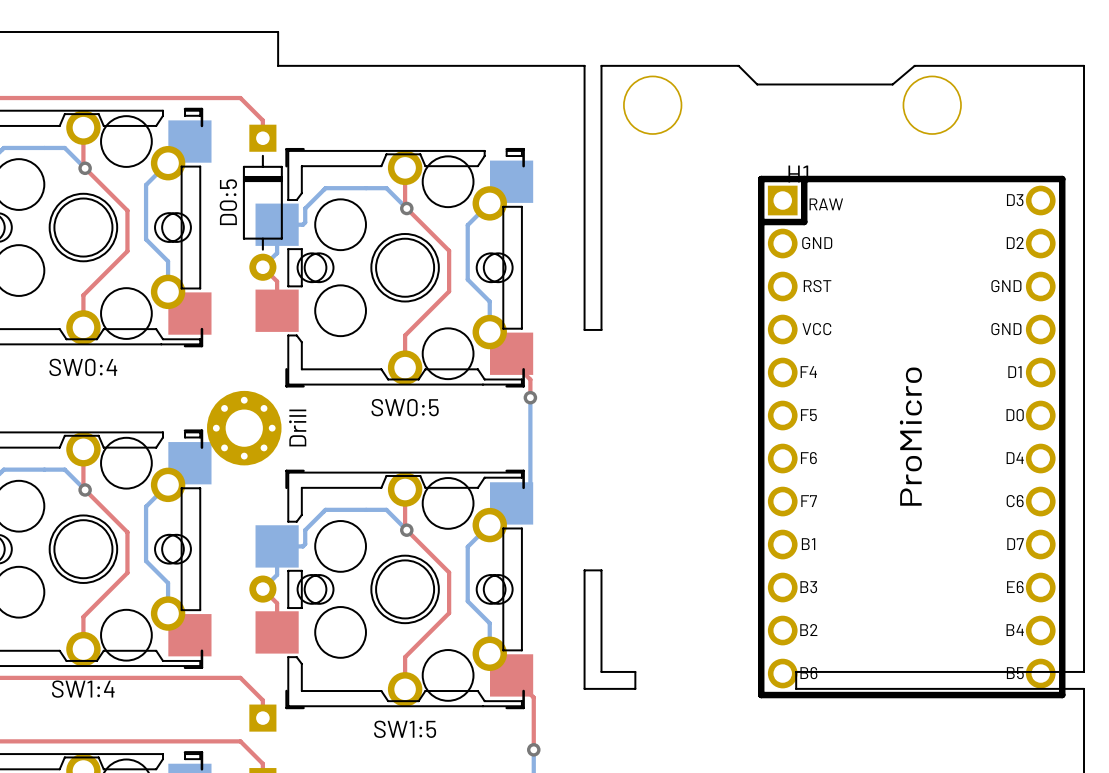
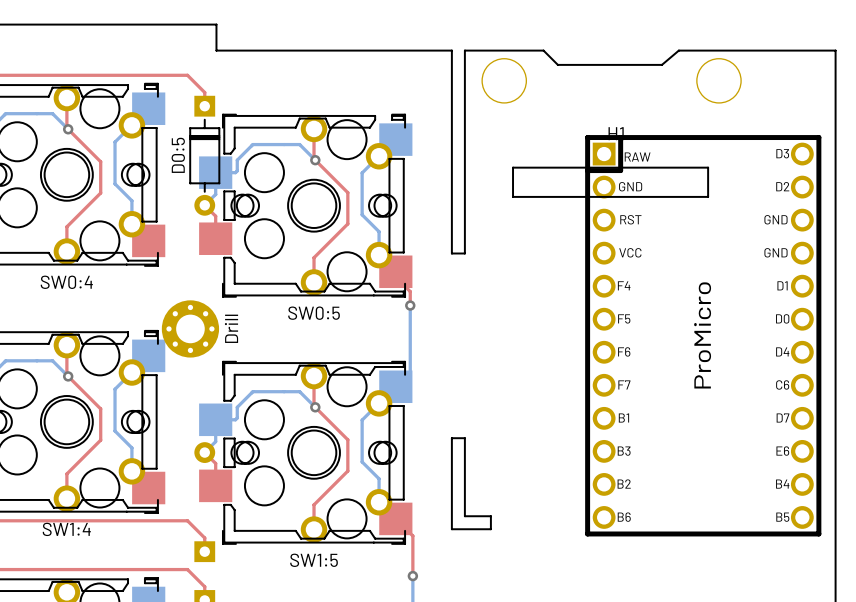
board edge: (703, 65) (738, 65) (757, 84) -> (543, 50) (557, 64) (584, 64)
board edge: (914, 65) (892, 84) (857, 84) -> (705, 50) (678, 50) (661, 64)
board edge: none -> (513, 167) (513, 196) (708, 196) (708, 167) (513, 167)
board edge: (1084, 671) (796, 671) (796, 688) (1084, 688) -> (835, 516) (835, 529)

